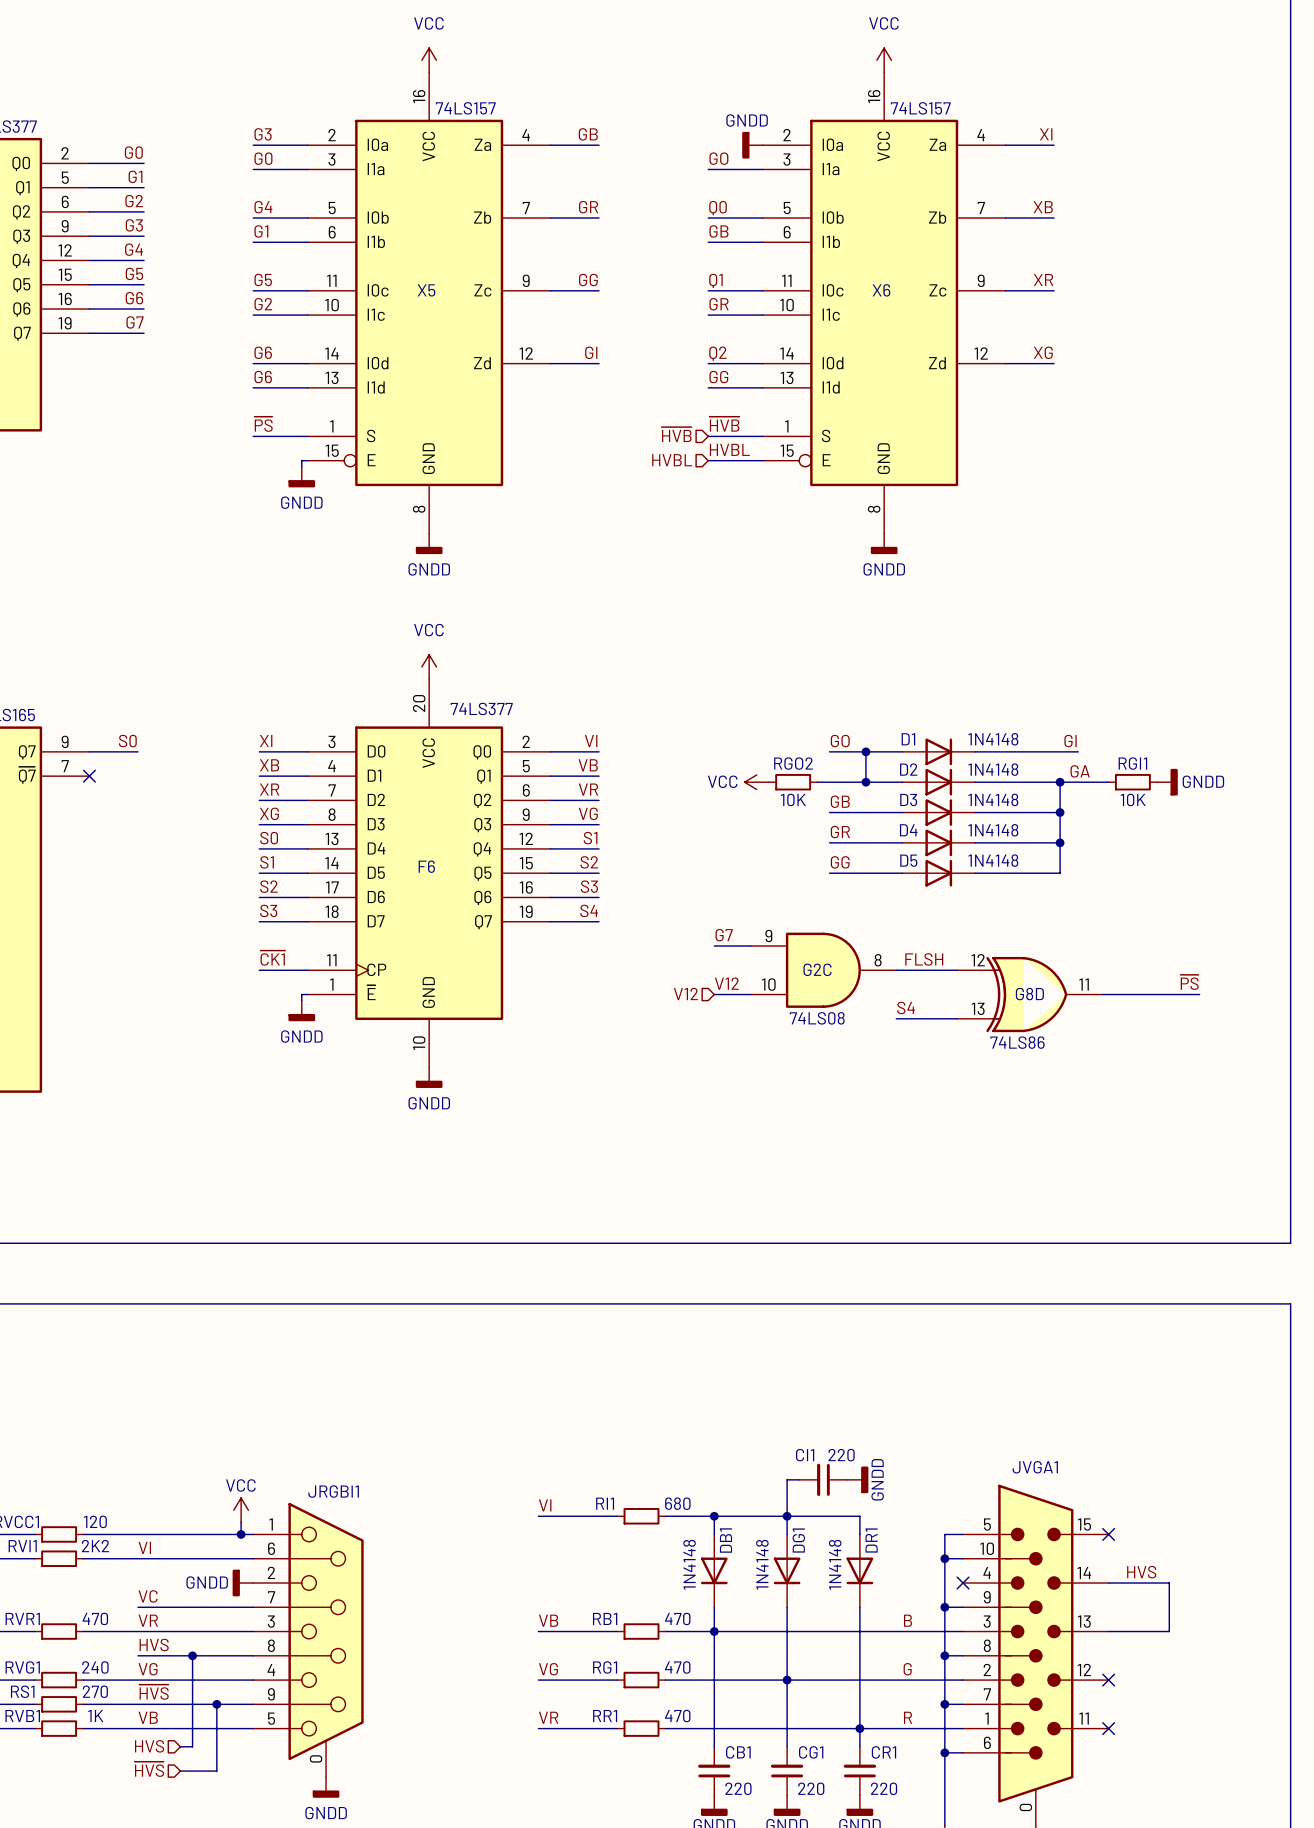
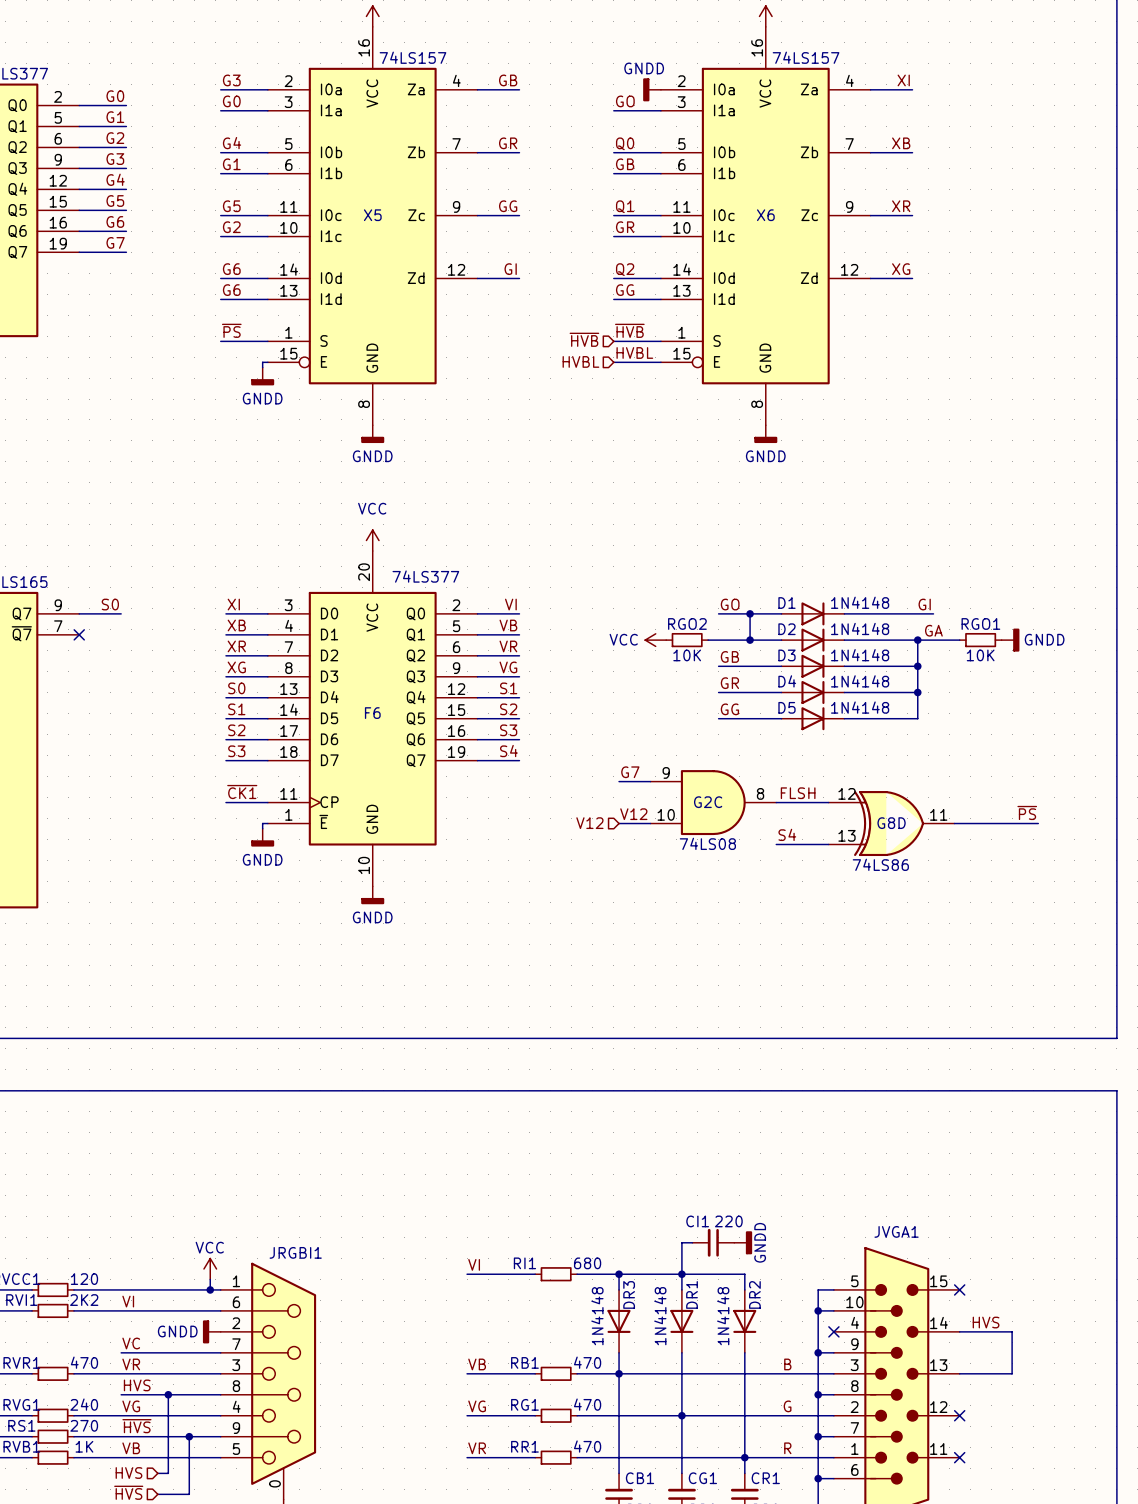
RGI1 name: RGI1 (1132, 763) -> RGO1 (980, 623)
DB1 name: DB1 (725, 1540) -> DR3 (629, 1294)
DG1 name: DG1 (798, 1540) -> DR1 (692, 1294)
DR1 name: DR1 (871, 1540) -> DR2 (754, 1294)

